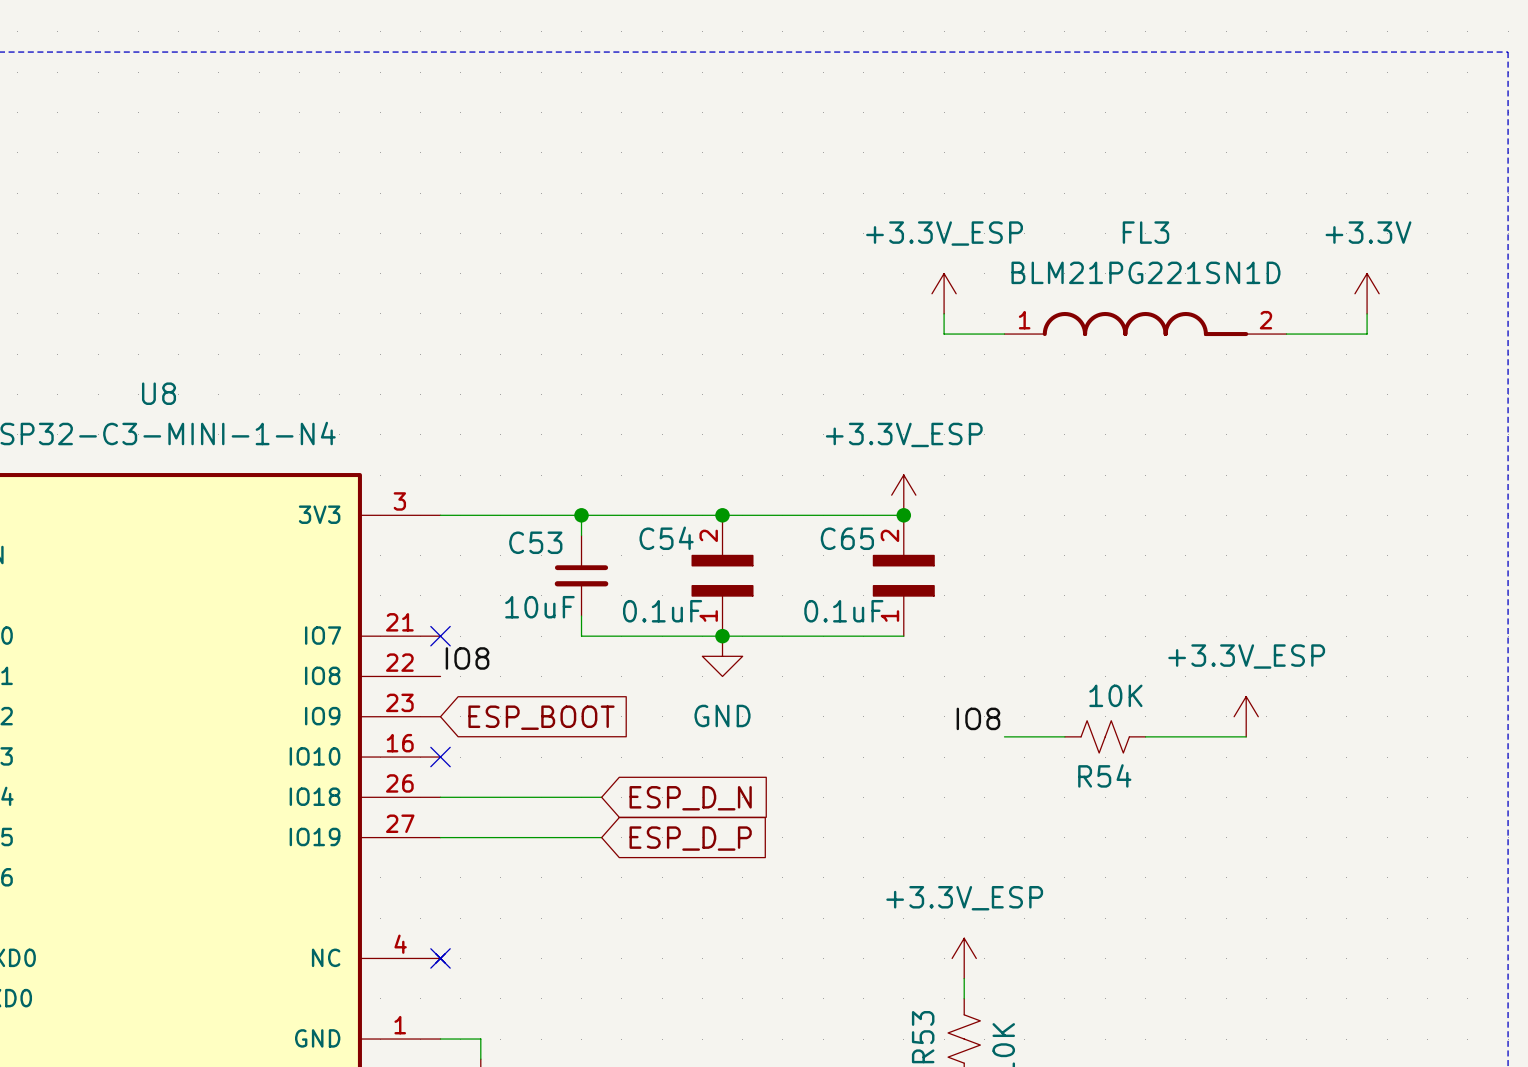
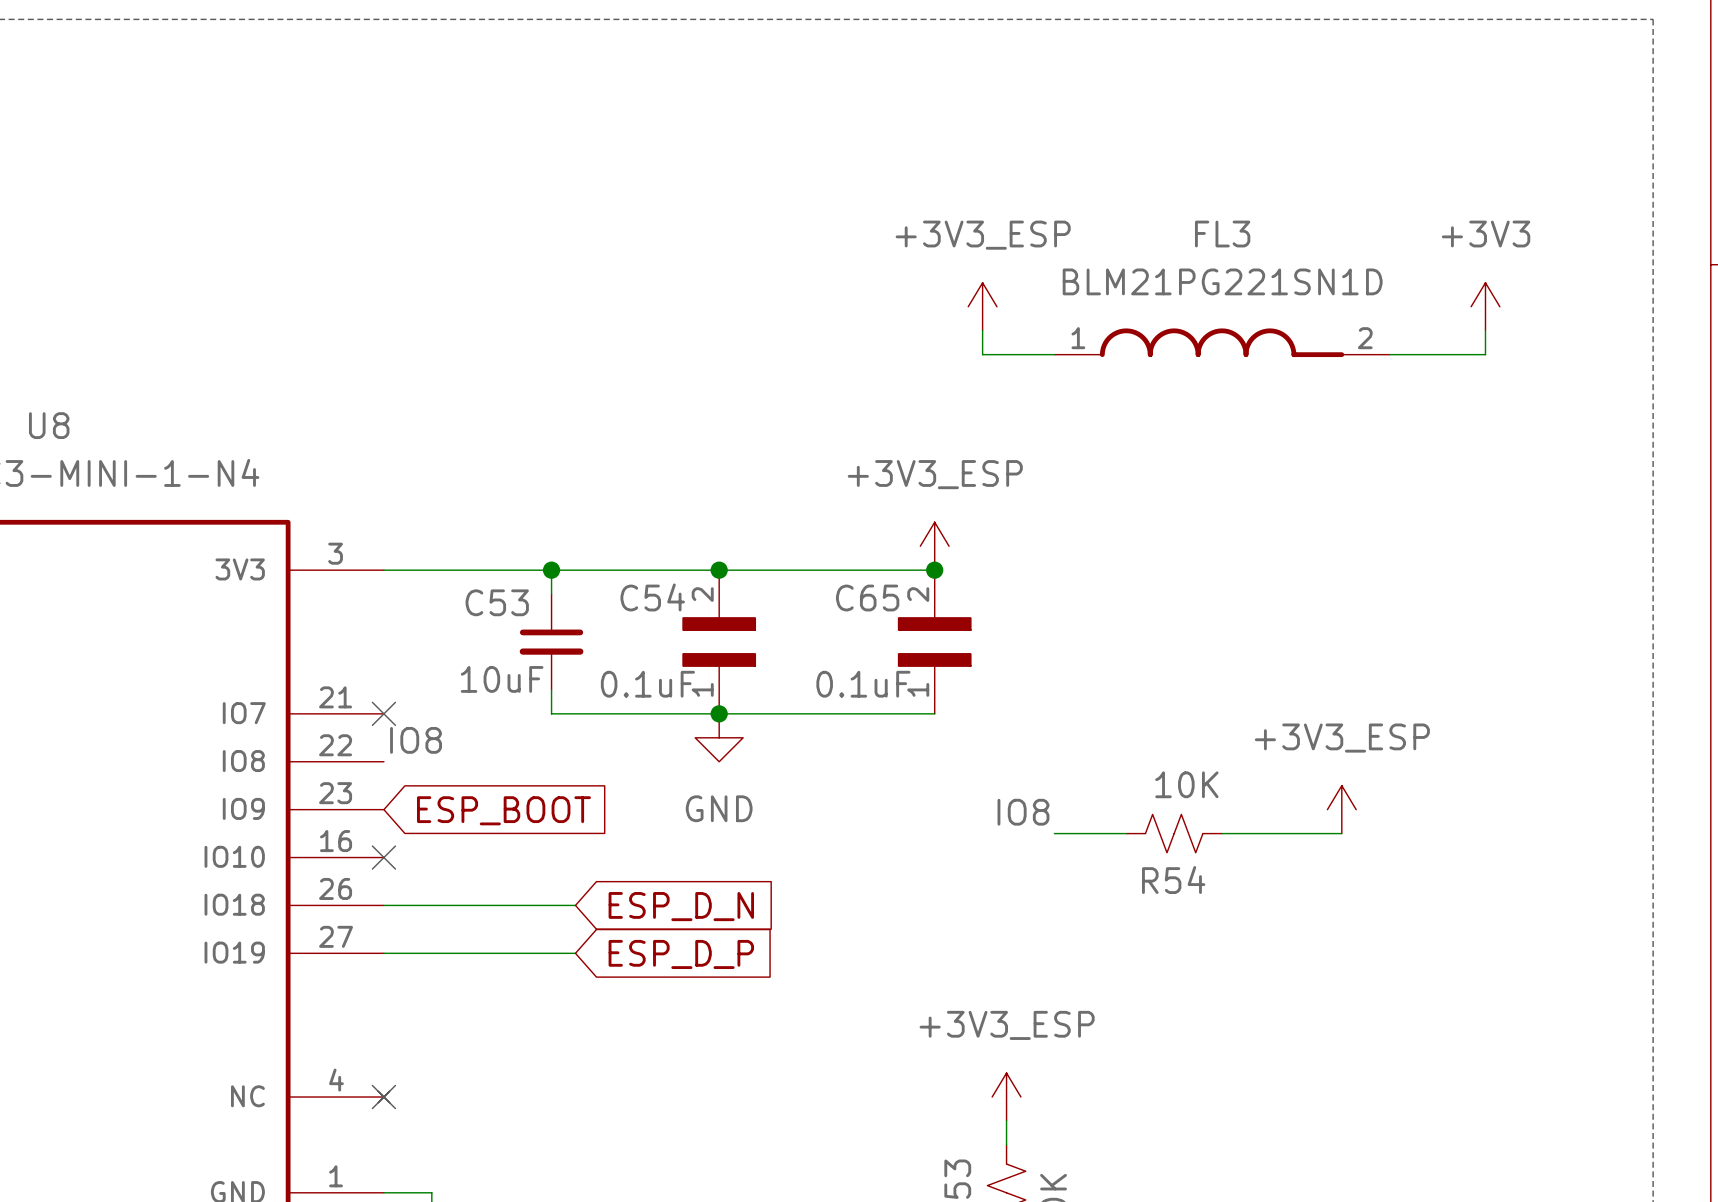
power symbol: +3.3V_ESP (944, 293) -> +3V3_ESP (982, 306)
power symbol: +3.3V (1367, 293) -> +3V3 (1485, 306)
power symbol: +3.3V_ESP (903, 495) -> +3V3_ESP (934, 546)
power symbol: +3.3V_ESP (1246, 716) -> +3V3_ESP (1341, 809)
power symbol: +3.3V_ESP (964, 958) -> +3V3_ESP (1006, 1097)

